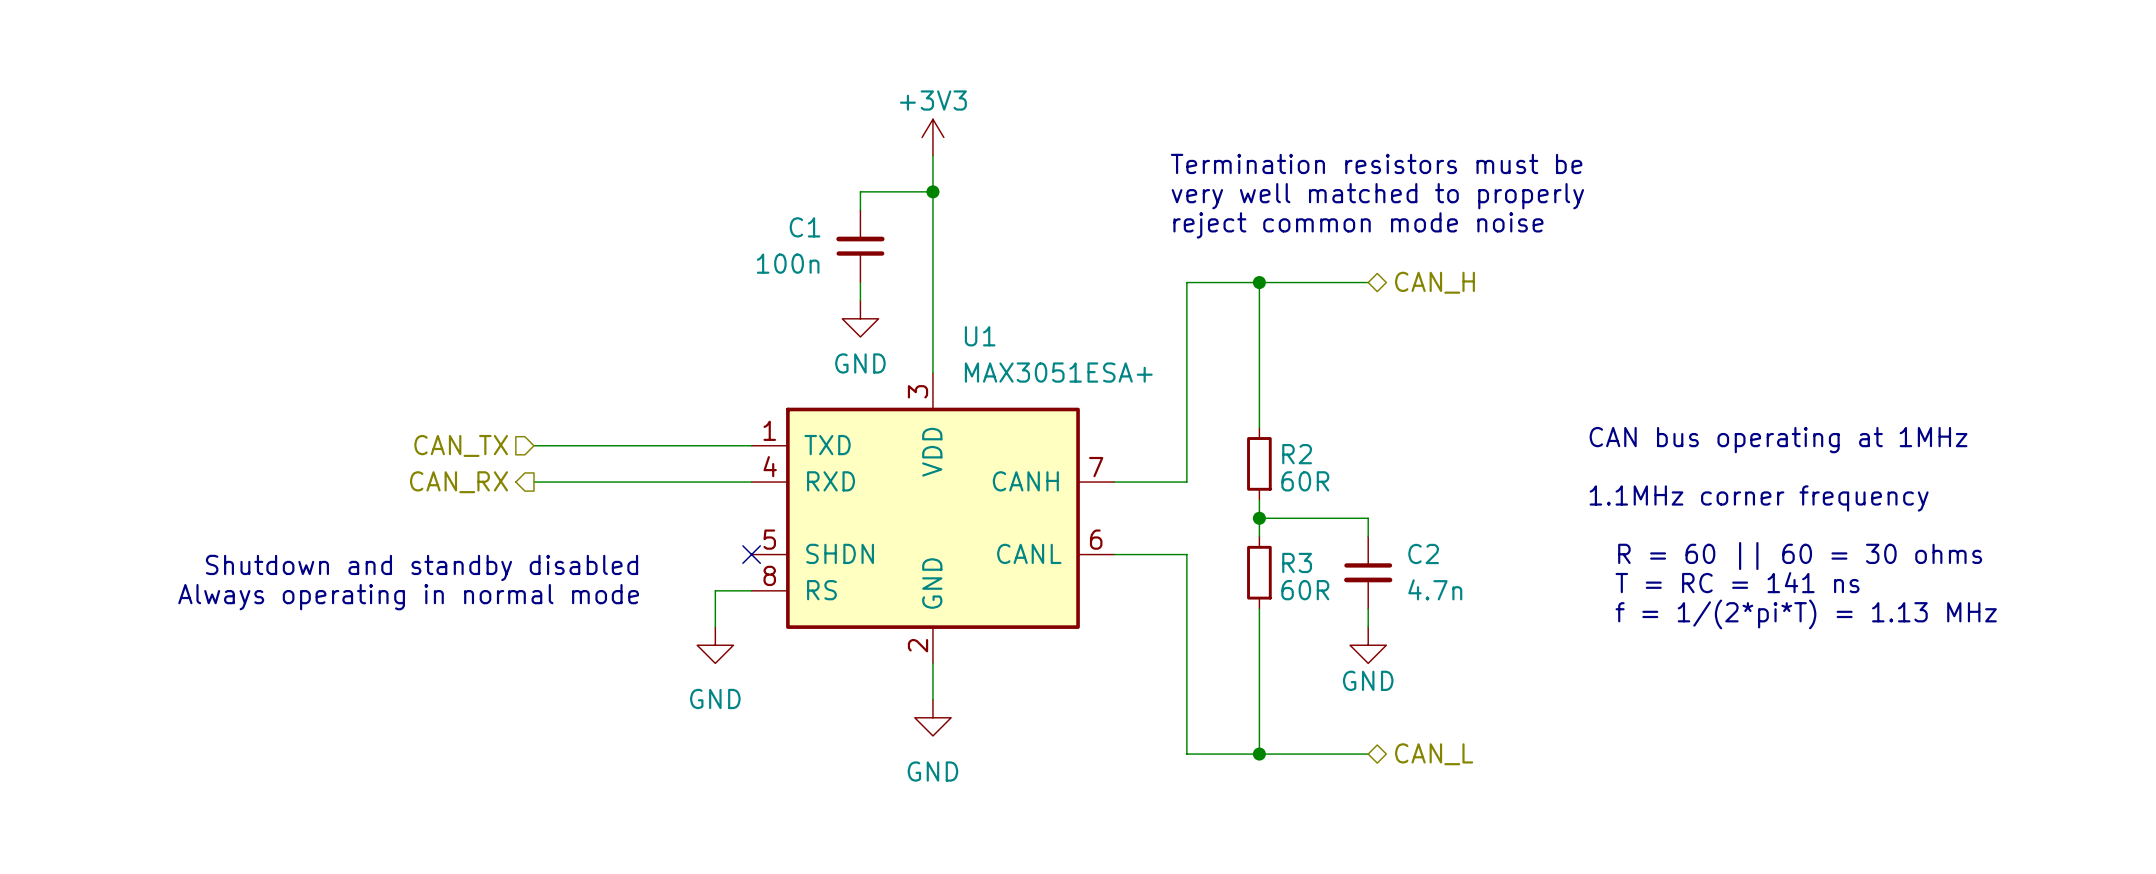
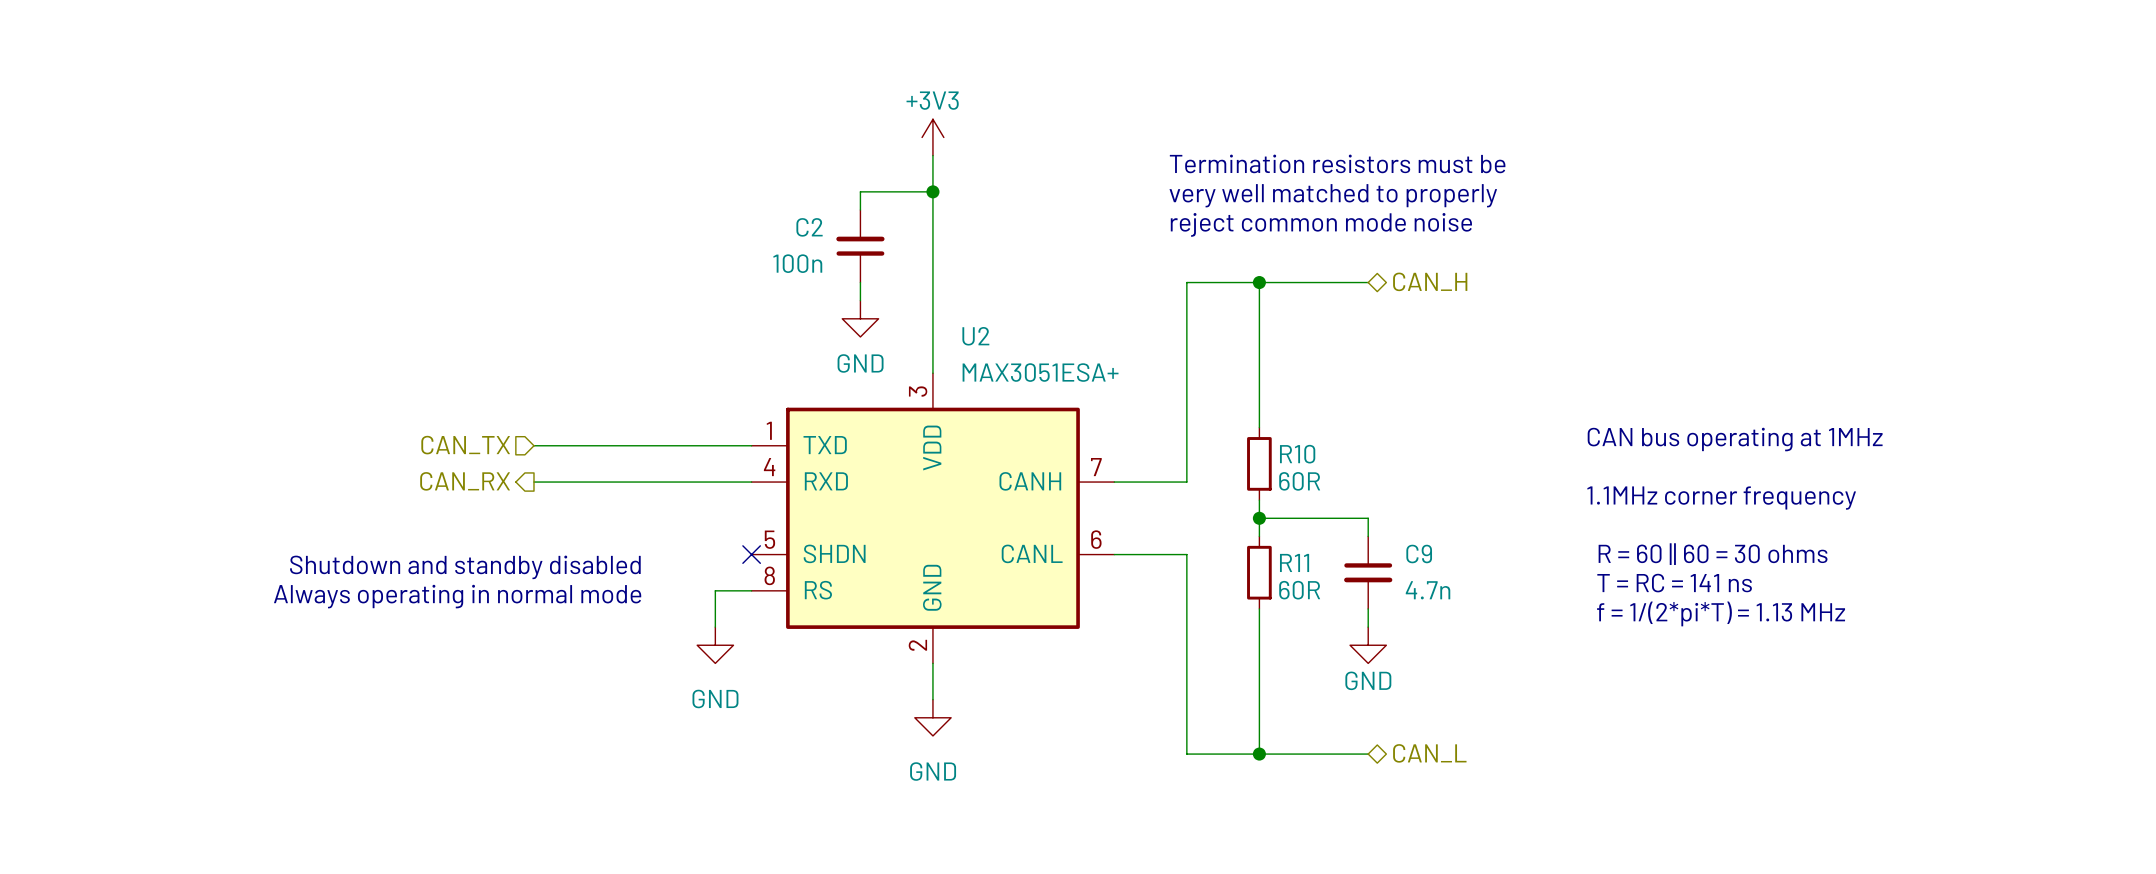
C1 name: C1 (805, 227) -> C2 (809, 227)
U1 name: U1 (980, 336) -> U2 (975, 336)
R2 name: R2 (1297, 454) -> R10 (1297, 454)
C2 name: C2 (1423, 553) -> C9 (1419, 553)
R3 name: R3 (1297, 562) -> R11 (1294, 562)

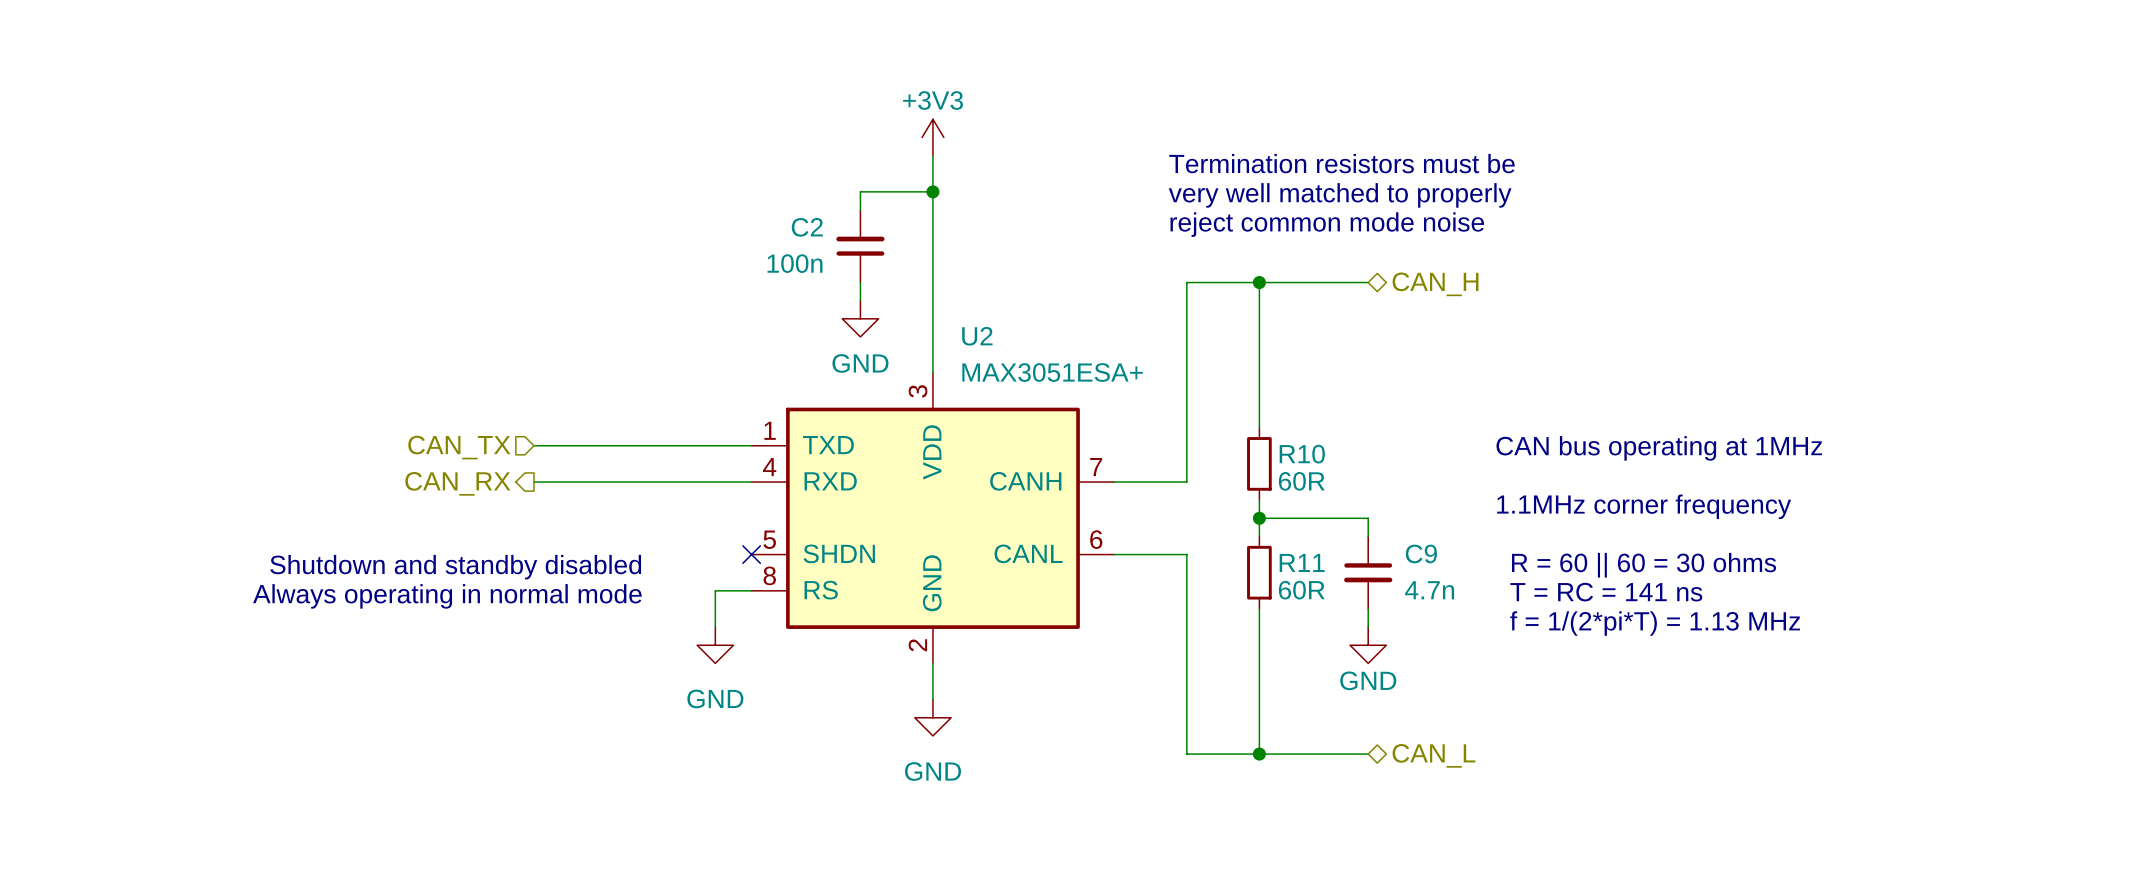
text position: CAN bus operating at 1MHz (1735, 439) -> CAN bus operating at 1MHz (1659, 448)
text position: 1.1MHz corner frequency (1721, 498) -> 1.1MHz corner frequency (1644, 506)
text position: R = 60 || 60 = 30 ohms (1713, 554) -> R = 60 || 60 = 30 ohms (1644, 565)
text position: T = RC = 141 ns (1674, 583) -> T = RC = 141 ns (1606, 592)
text position: f = 1/(2*pi*T) = 1.13 MHz (1721, 613) -> f = 1/(2*pi*T) = 1.13 MHz (1655, 623)

